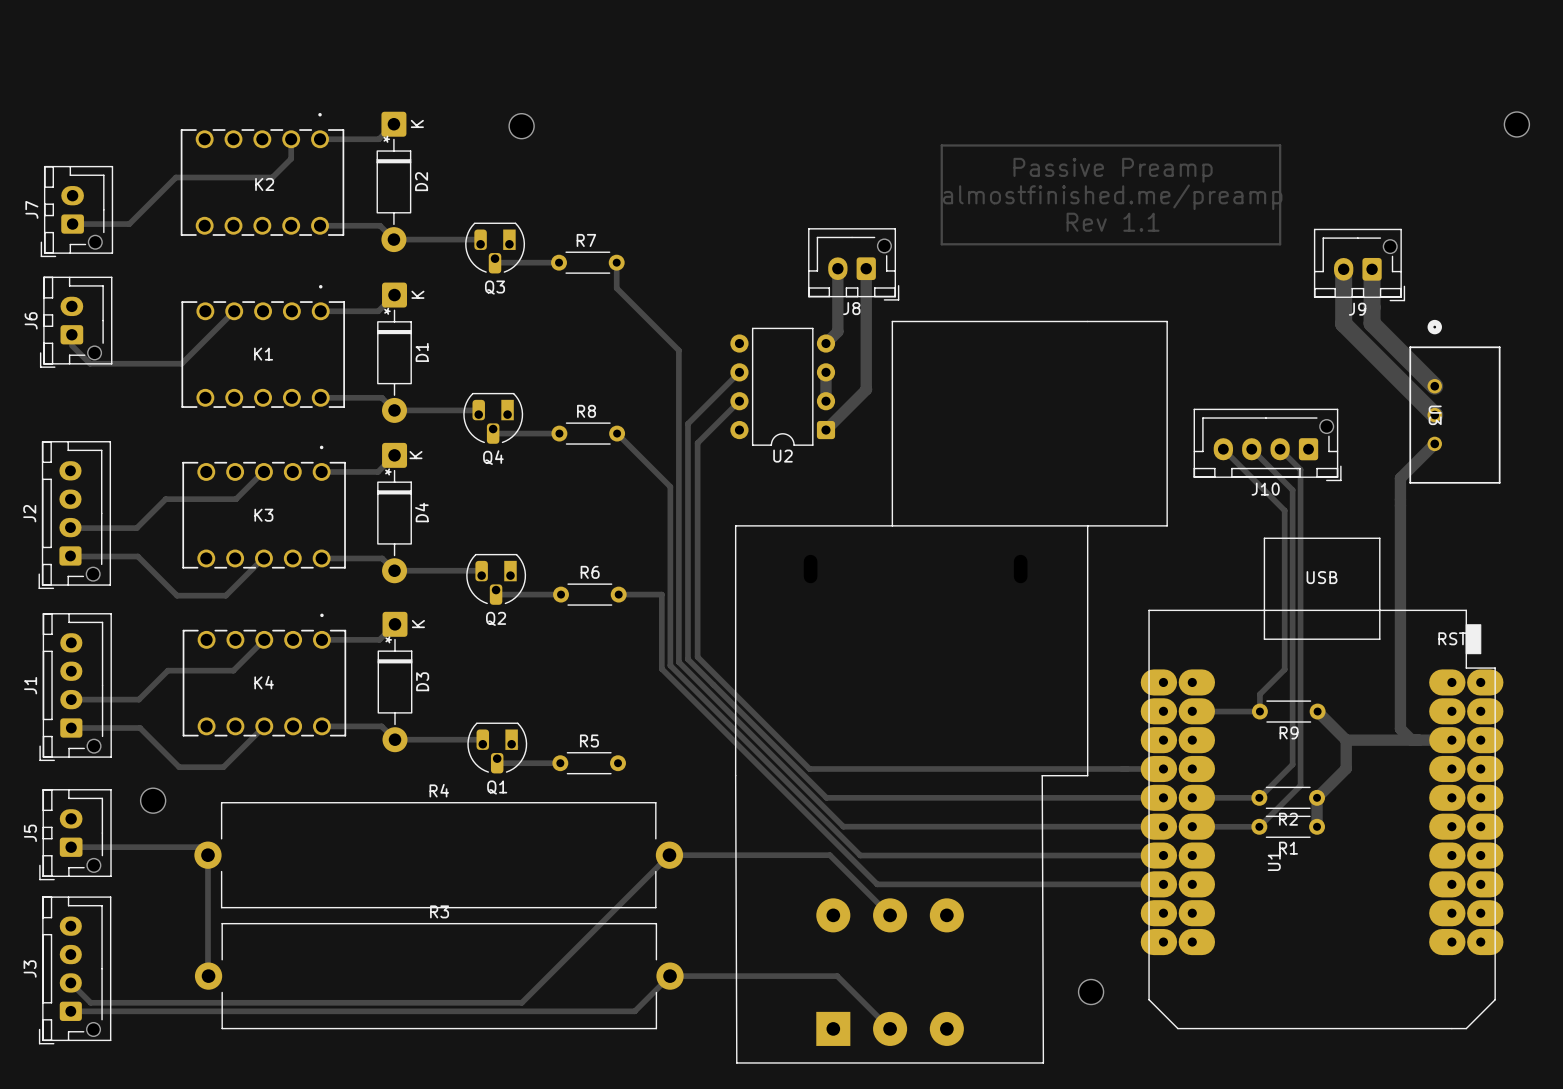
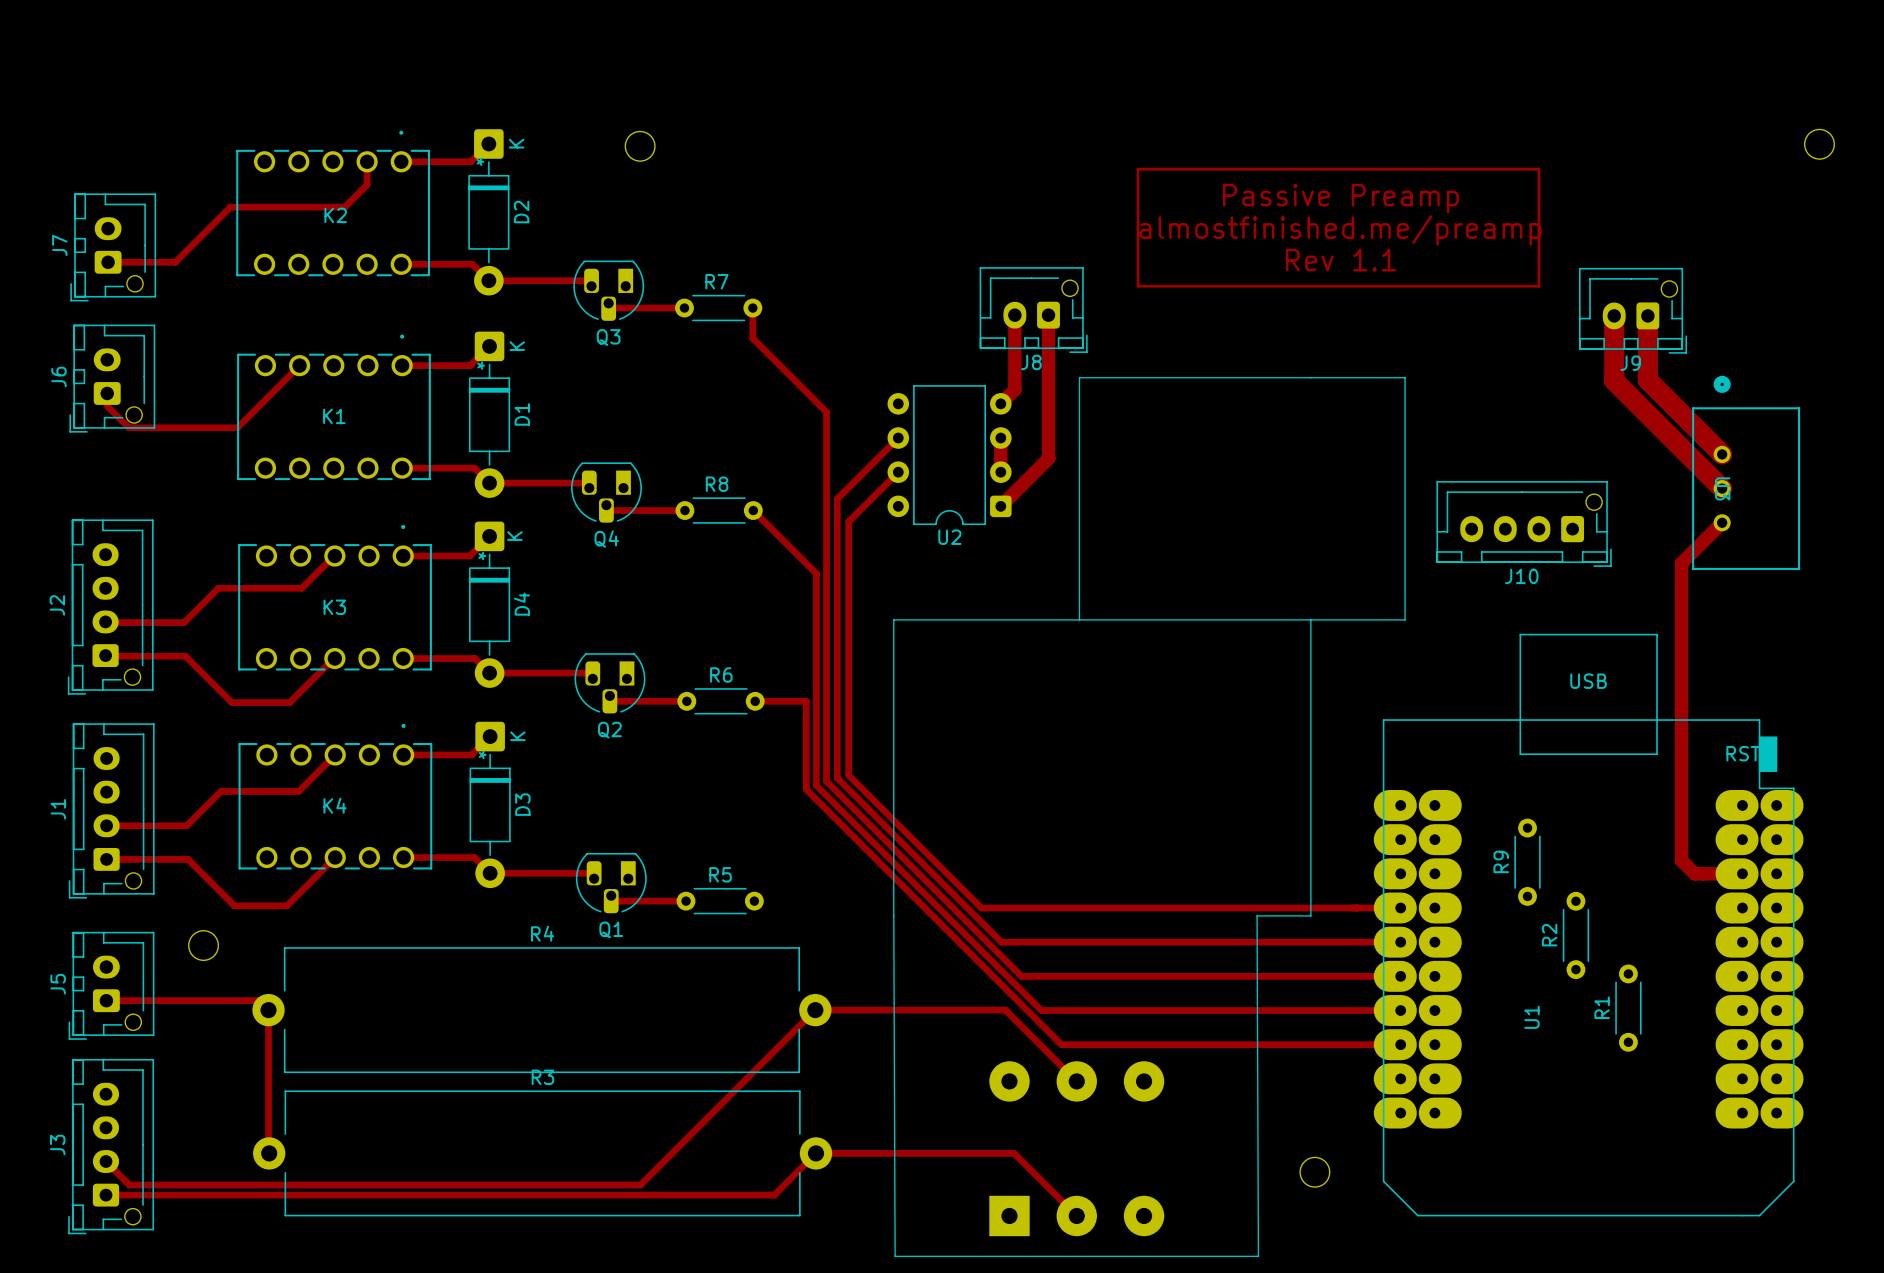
track: (1223, 449) (1284, 510) (1284, 669) (1259, 694) (1259, 705) -> none
track: (1251, 449) (1292, 490) (1292, 764) (1259, 797) (1192, 797) -> none
track: (1280, 449) (1300, 469) (1300, 785) (1259, 826) (1192, 826) -> none
track: (1192, 711) (1259, 711) -> none
R9 rotation: 0° (1288, 711) -> 90° clockwise (1527, 862)
track: (1317, 712) (1346, 740) -> none
track: (1346, 740) (1411, 740) -> none
track: (1346, 740) (1346, 768) (1317, 797) (1317, 826) -> none
R2 rotation: 0° (1288, 797) -> 90° clockwise (1575, 935)
R1 rotation: 0° (1288, 826) -> 90° clockwise (1628, 1008)
R1 position: (1288, 826) -> (1628, 1008)

